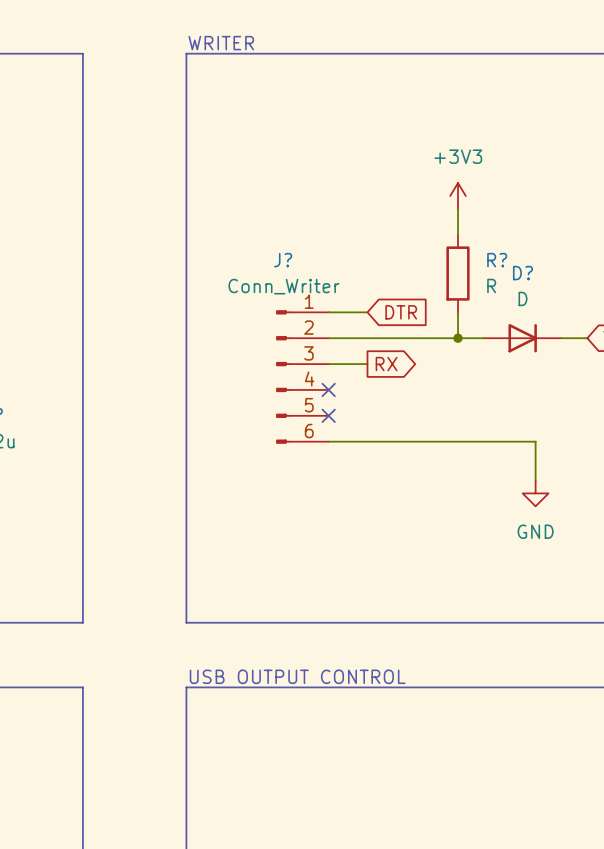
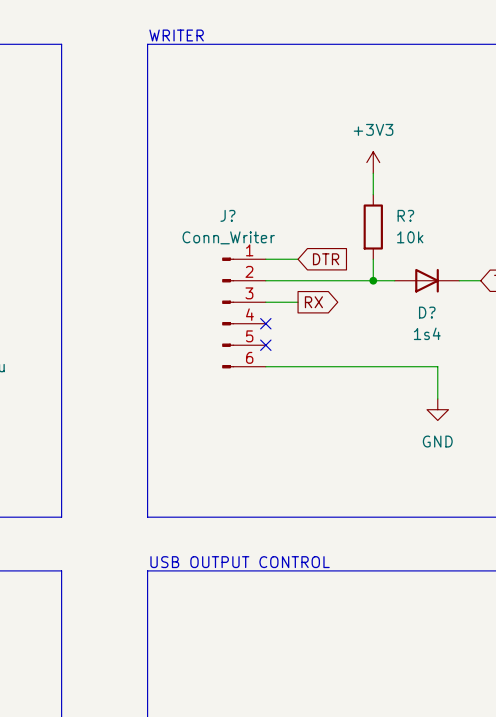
D? name position: D? (522, 273) -> D? (427, 312)
R? value: R (491, 286) -> 10k (410, 237)
D? value: D (522, 298) -> 1s4 (427, 333)

